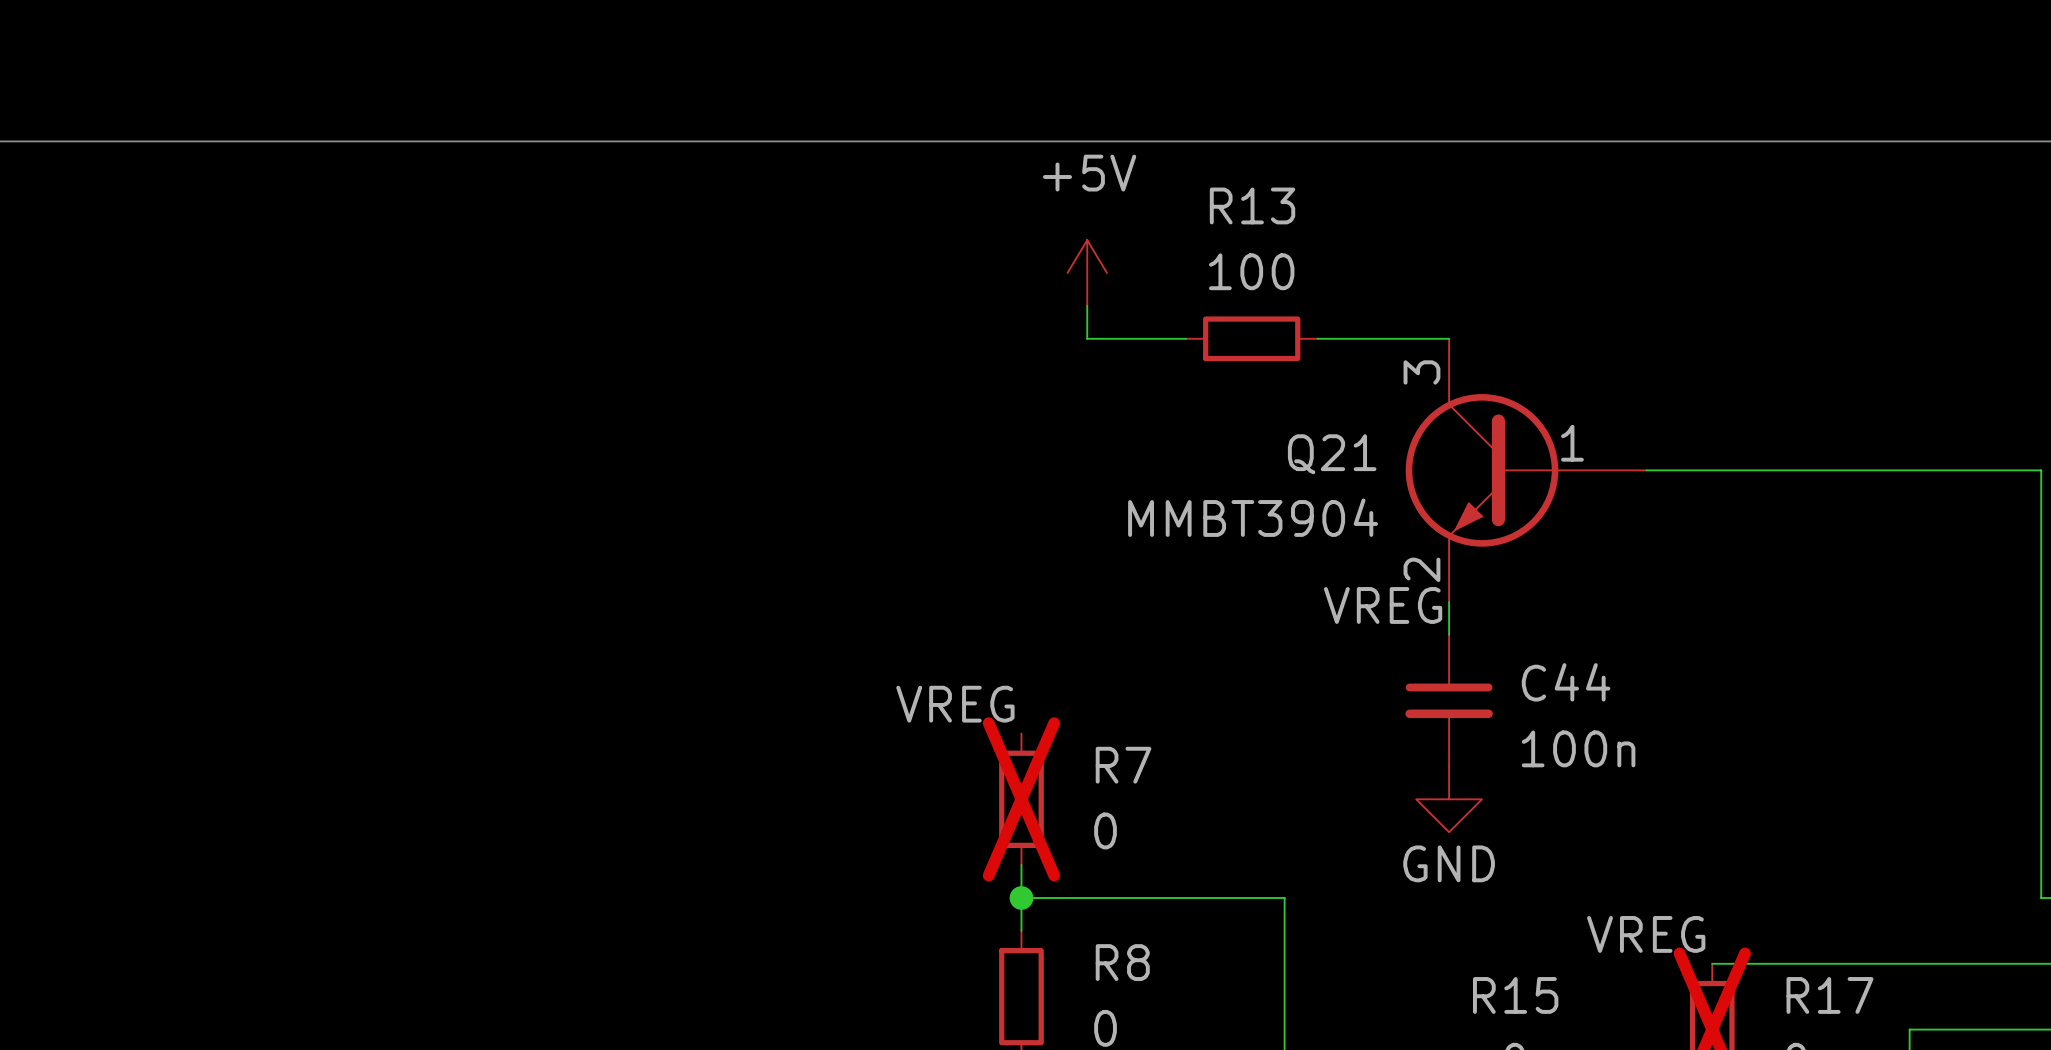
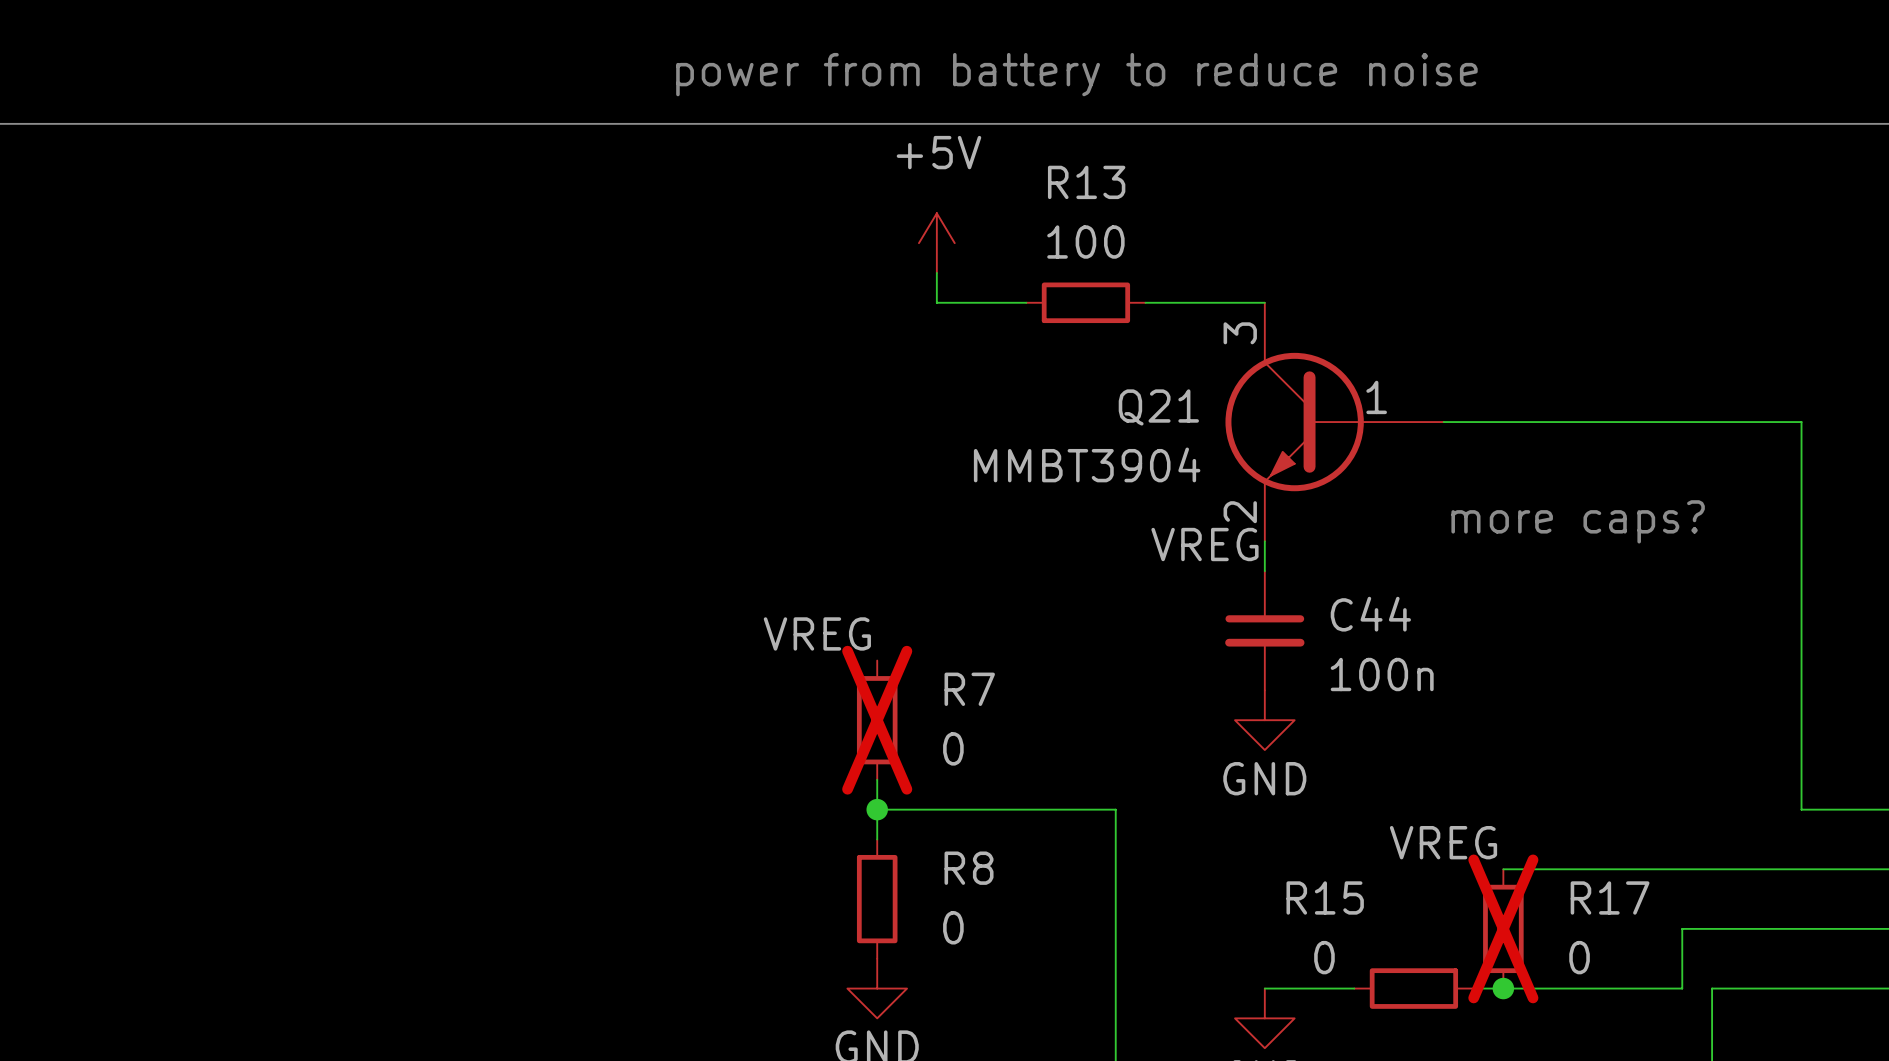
text: none -> power from battery to reduce noise (1076, 74)
text: none -> more caps? (1578, 521)

